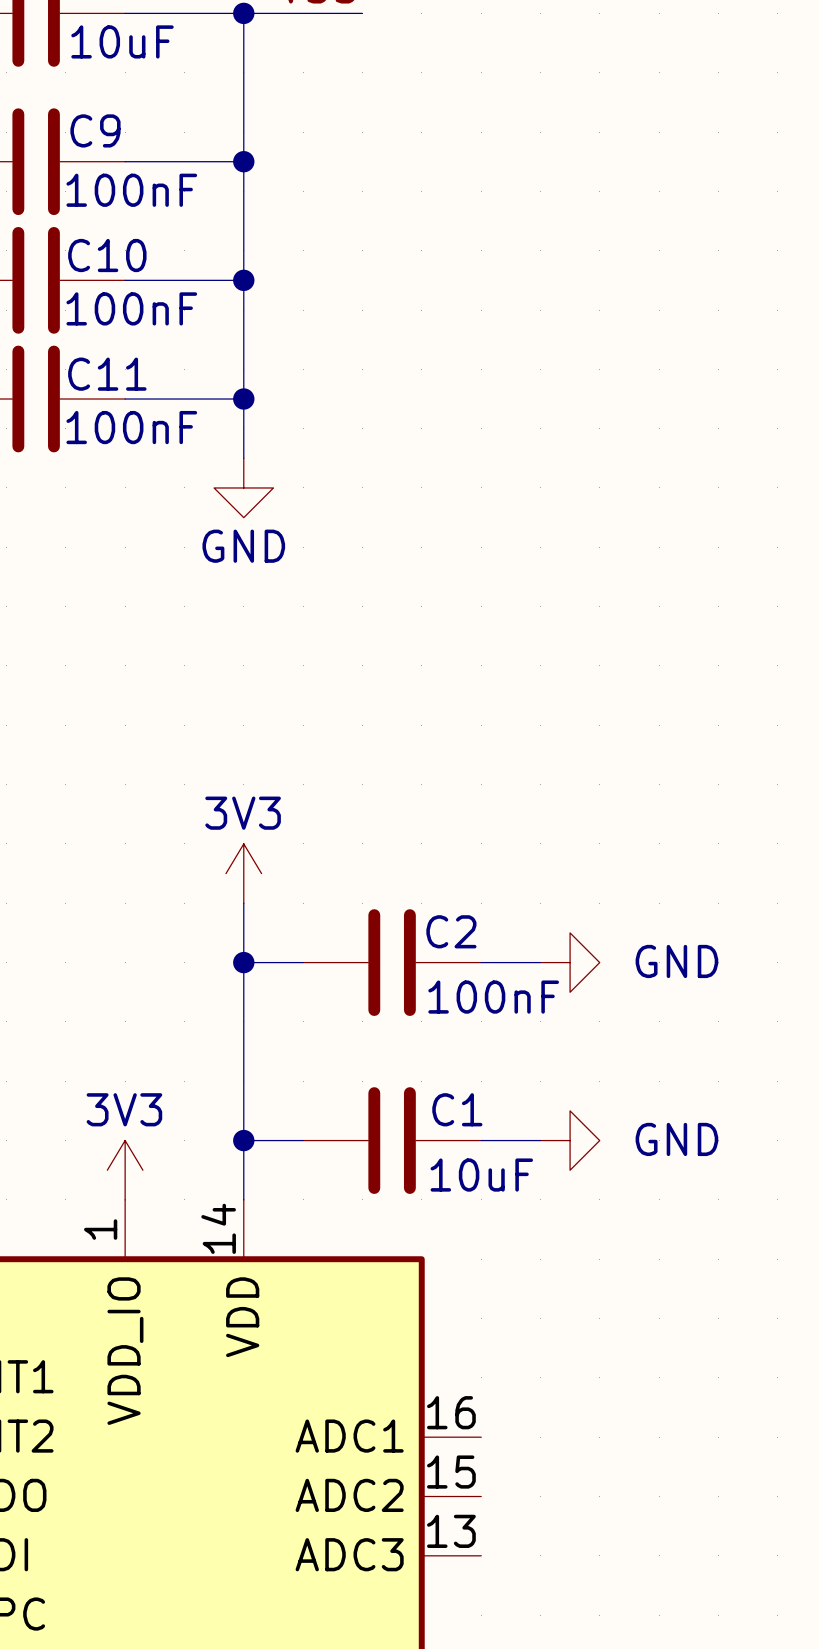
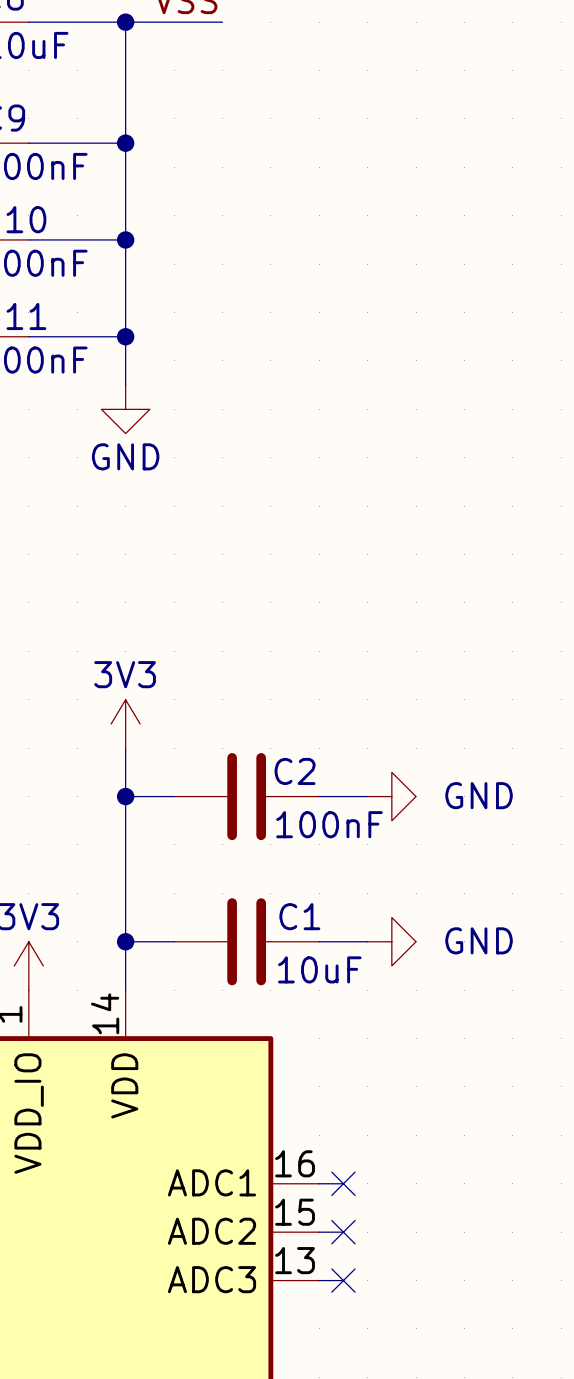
wire: none -> (319, 1183) (343, 1183)
no-connect mark: none -> (343, 1183)
wire: none -> (319, 1232) (343, 1232)
no-connect mark: none -> (343, 1232)
wire: none -> (319, 1280) (343, 1280)
no-connect mark: none -> (343, 1280)

